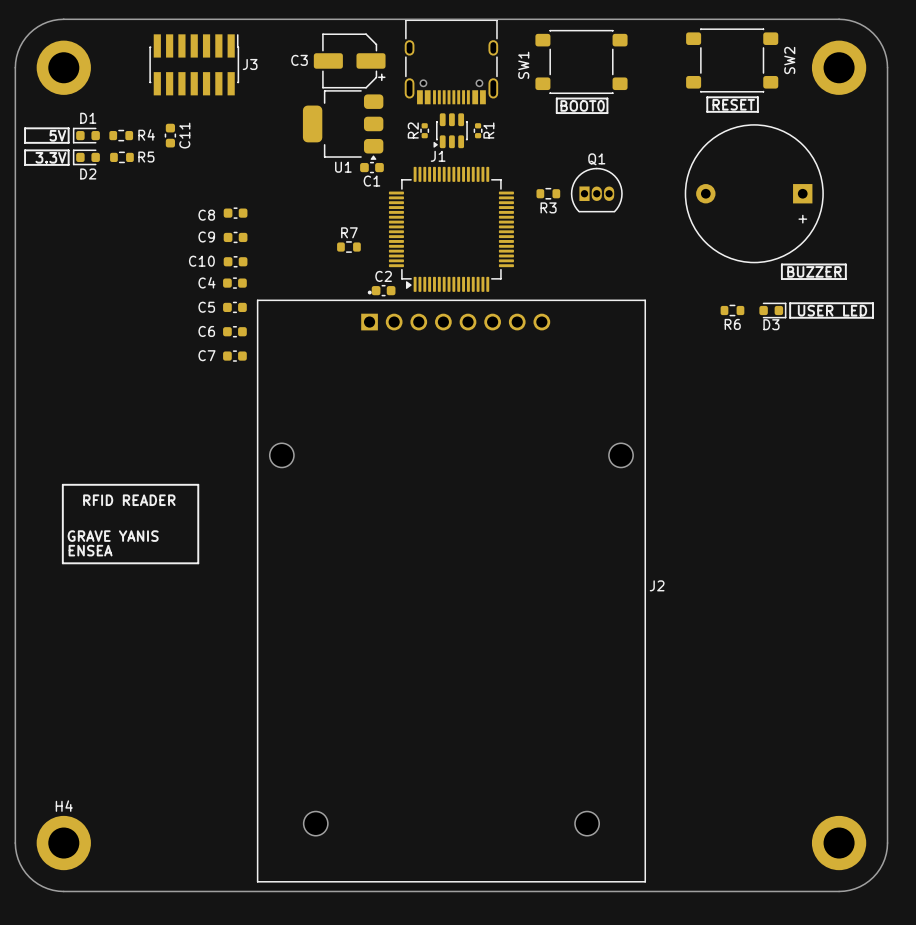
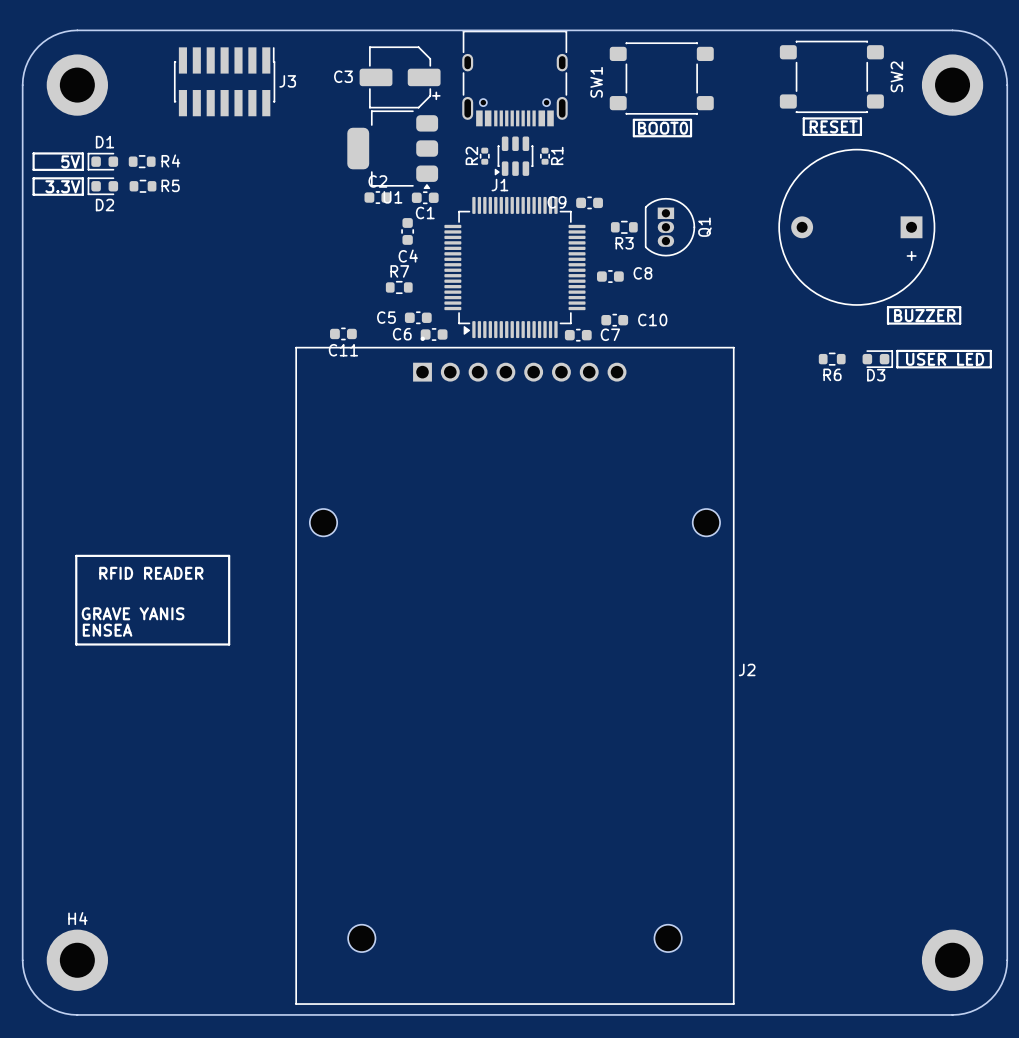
C11 rotation: 0° (170, 135) -> 90° clockwise (343, 333)
C11 position: (170, 135) -> (343, 333)
Q1 rotation: 0° (596, 190) -> 90° clockwise (670, 227)
C8 position: (235, 213) -> (610, 276)
C8 name position: C8 (206, 215) -> C8 (642, 273)
C9 position: (235, 237) -> (589, 202)
C10 name position: C10 (201, 261) -> C10 (652, 319)
C10 position: (235, 261) -> (614, 320)
C4 name position: C4 (206, 282) -> C4 (408, 256)
C4 rotation: 0° (234, 283) -> 90° clockwise (407, 231)
C4 position: (234, 283) -> (407, 231)
C2 position: (383, 290) -> (377, 197)
C5 position: (234, 307) -> (418, 317)
C6 position: (234, 331) -> (434, 334)
C7 name position: C7 (206, 355) -> C7 (610, 334)
C7 position: (234, 356) -> (578, 335)

